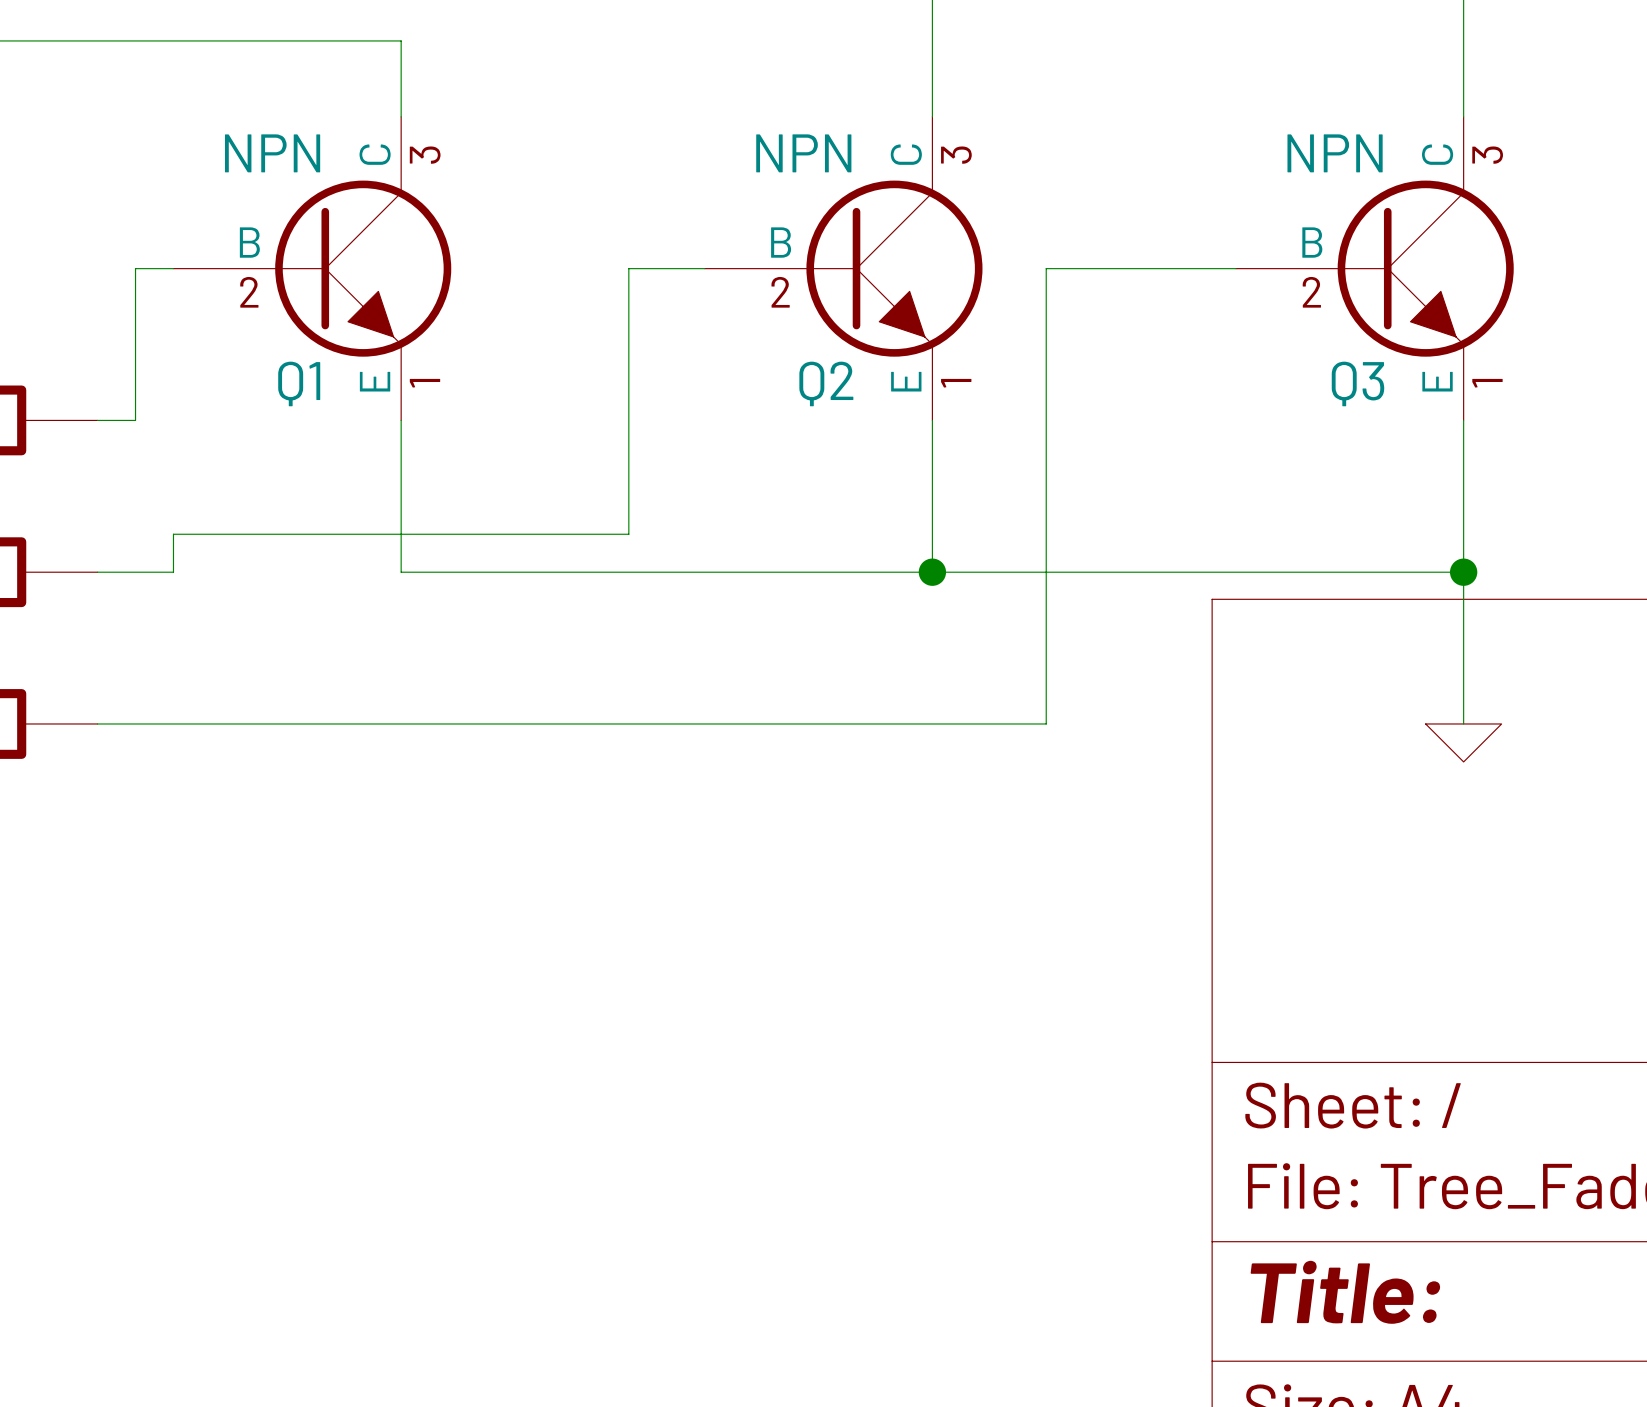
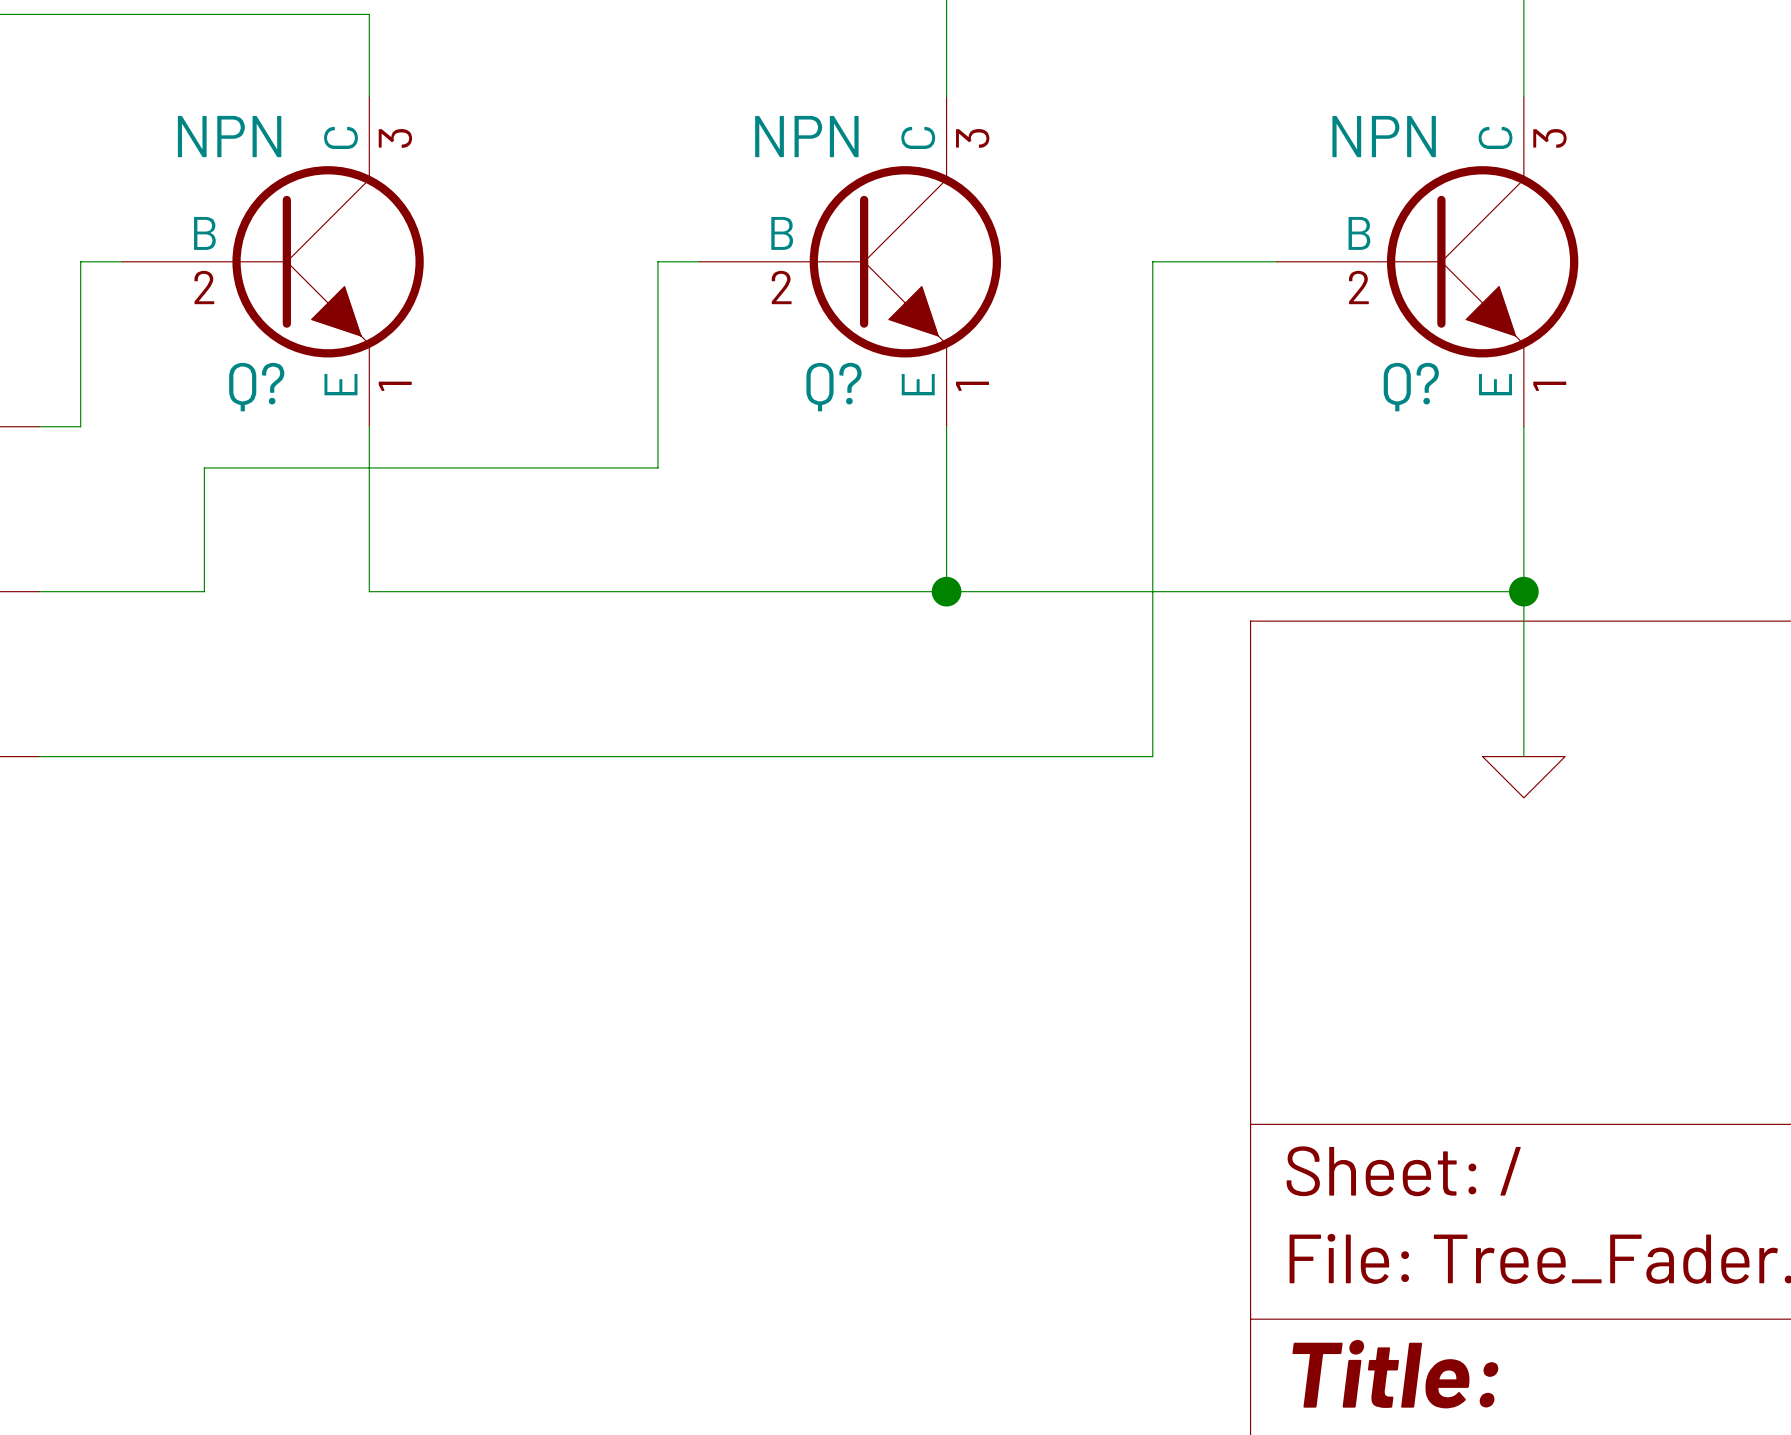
wire: (666, 268) (628, 268) (628, 534) (173, 534) (173, 572) -> (657, 261) (657, 467) (204, 467) (204, 591) (121, 591)
wire: (1122, 268) (1046, 268) (1046, 723) -> (1152, 261) (1152, 756) (1070, 756)
Q1 name: Q1 (299, 383) -> Q? (256, 387)
Q2 name: Q2 (826, 383) -> Q? (834, 387)
Q3 name: Q3 (1357, 383) -> Q? (1411, 387)

